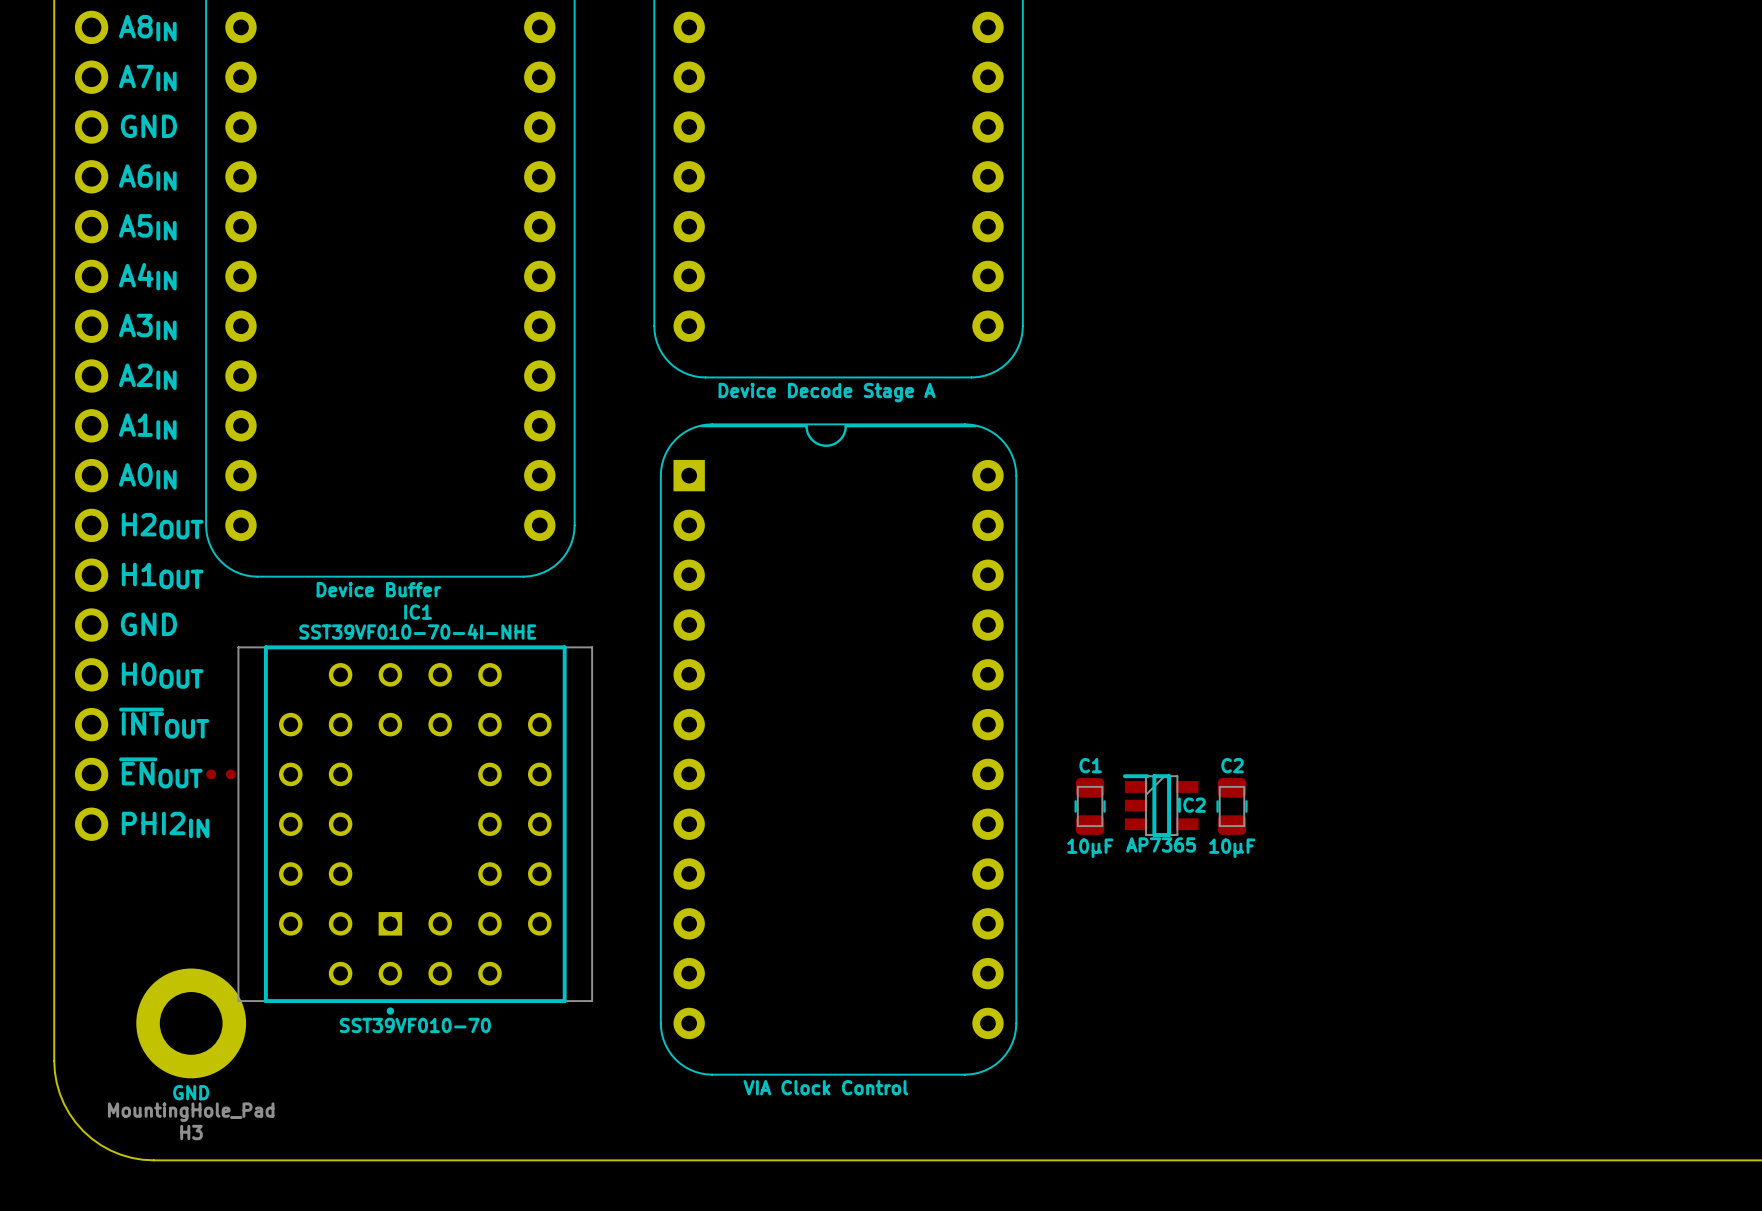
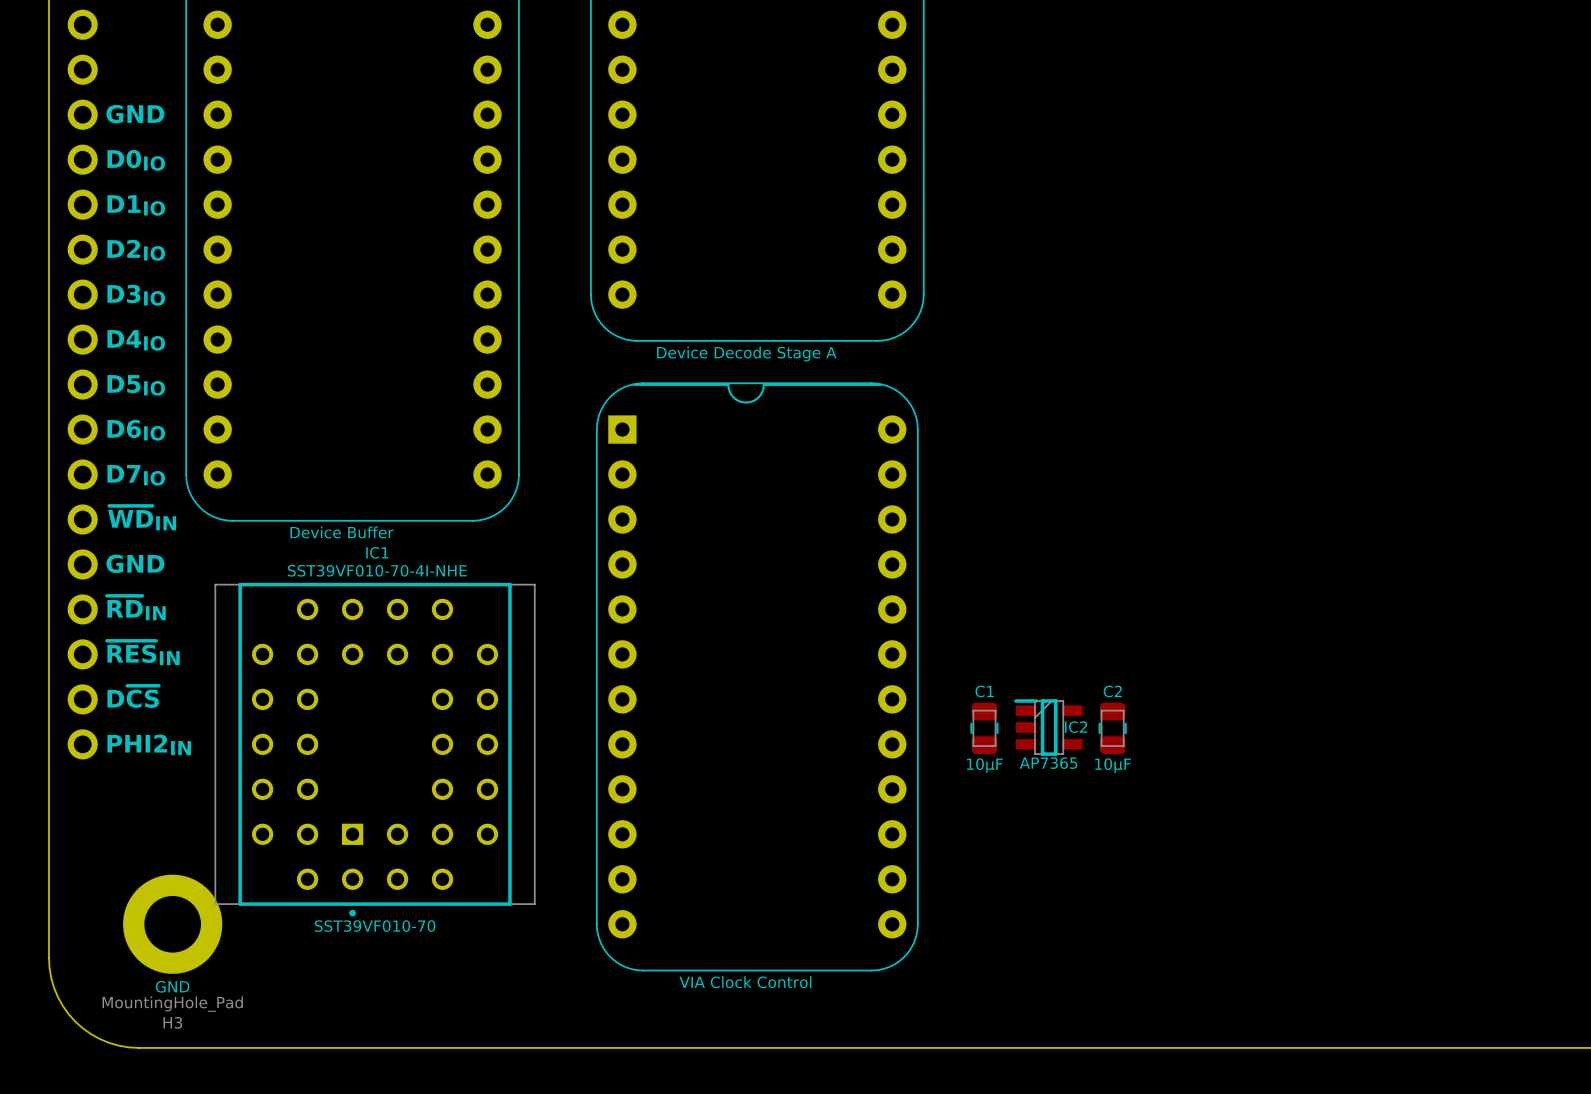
text: A8IN (147, 28) -> none
text: A7IN (147, 77) -> none
text: A6IN (147, 177) -> D0IO (136, 160)
text: A5IN (147, 227) -> D1IO (136, 205)
text: A4IN (147, 276) -> D2IO (136, 250)
text: A3IN (147, 326) -> D3IO (136, 295)
text: A2IN (147, 376) -> D4IO (136, 340)
text: A1IN (147, 426) -> D5IO (136, 385)
text: A0IN (147, 476) -> D6IO (136, 430)
text: H2OUT (162, 526) -> D7IO (136, 475)
text: H1OUT (162, 575) -> ~{WD}IN (142, 518)
text: H0OUT (162, 675) -> ~{RD}IN (136, 608)
text: ~{INT}OUT (164, 723) -> ~{RES}IN (143, 653)
text: ~{EN}OUT (160, 772) -> D~{CS} (133, 696)
part: (221, 774) -> none

